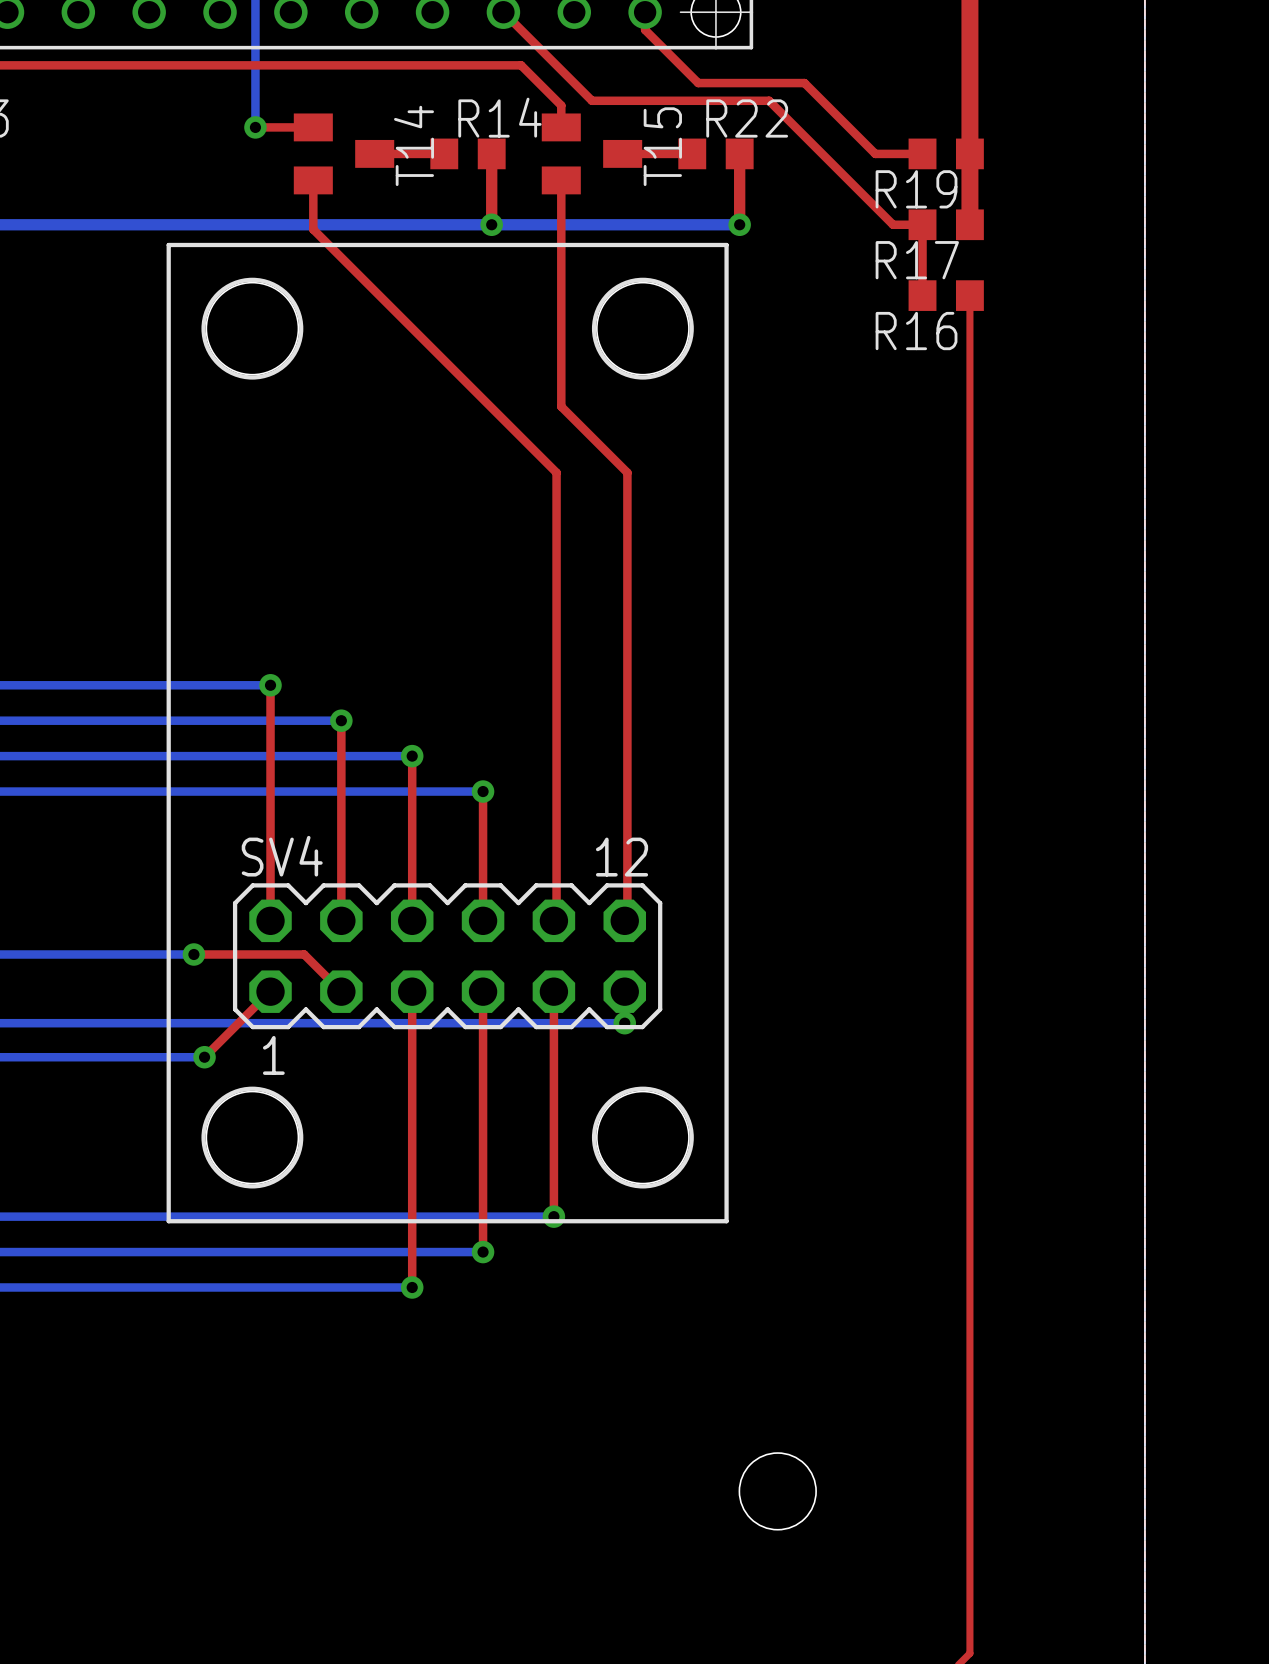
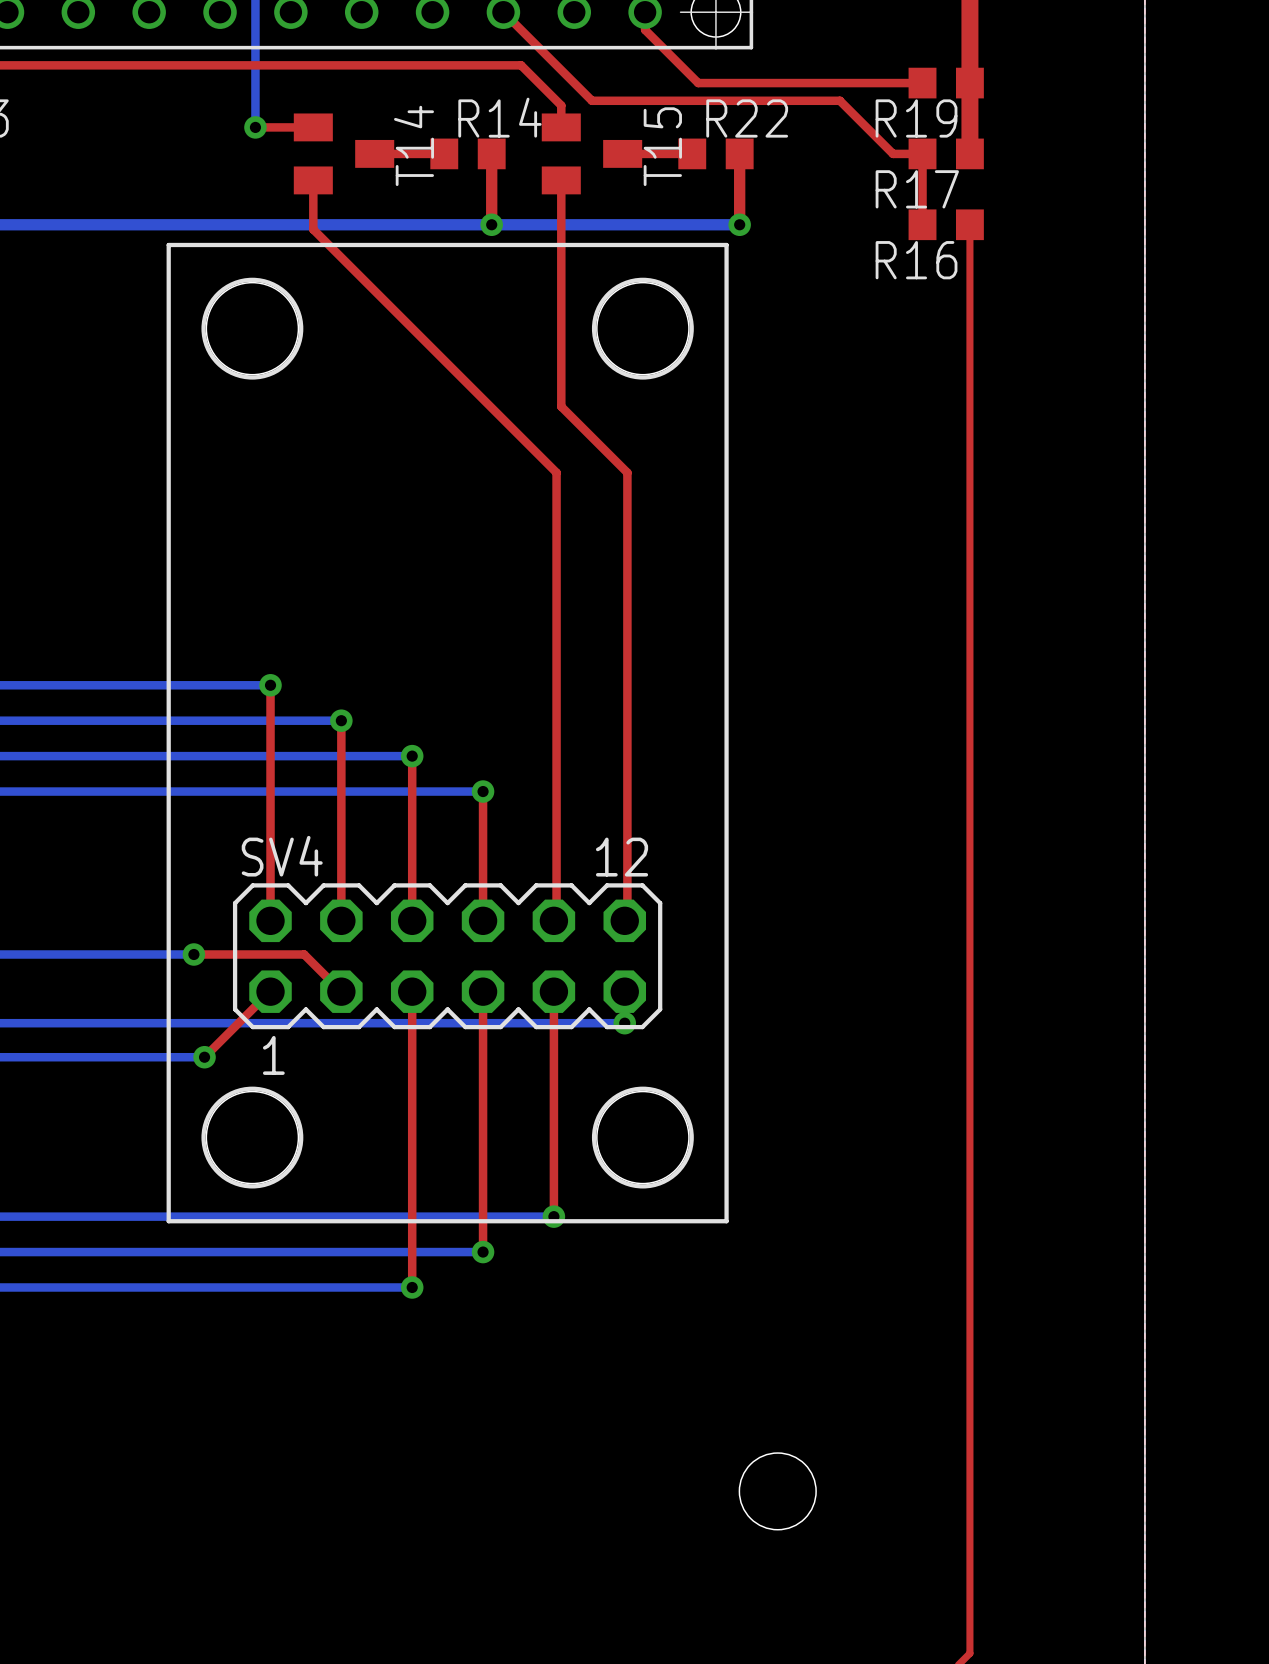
top track: (804, 83) (875, 153) (893, 153) -> (769, 100) (839, 100) (893, 153)
top track: none -> (804, 83) (922, 83)
R19: none -> (946, 83)
top track: (769, 100) (893, 224) (922, 224) (922, 295) -> none
top track: none -> (922, 153) (922, 224)
top track: (969, 153) (969, 224) -> (969, 295) (969, 224)
R19 name: R19 (916, 189) -> R17 (917, 189)
R17 name: R17 (917, 260) -> R16 (916, 260)
R16: (946, 295) -> none

